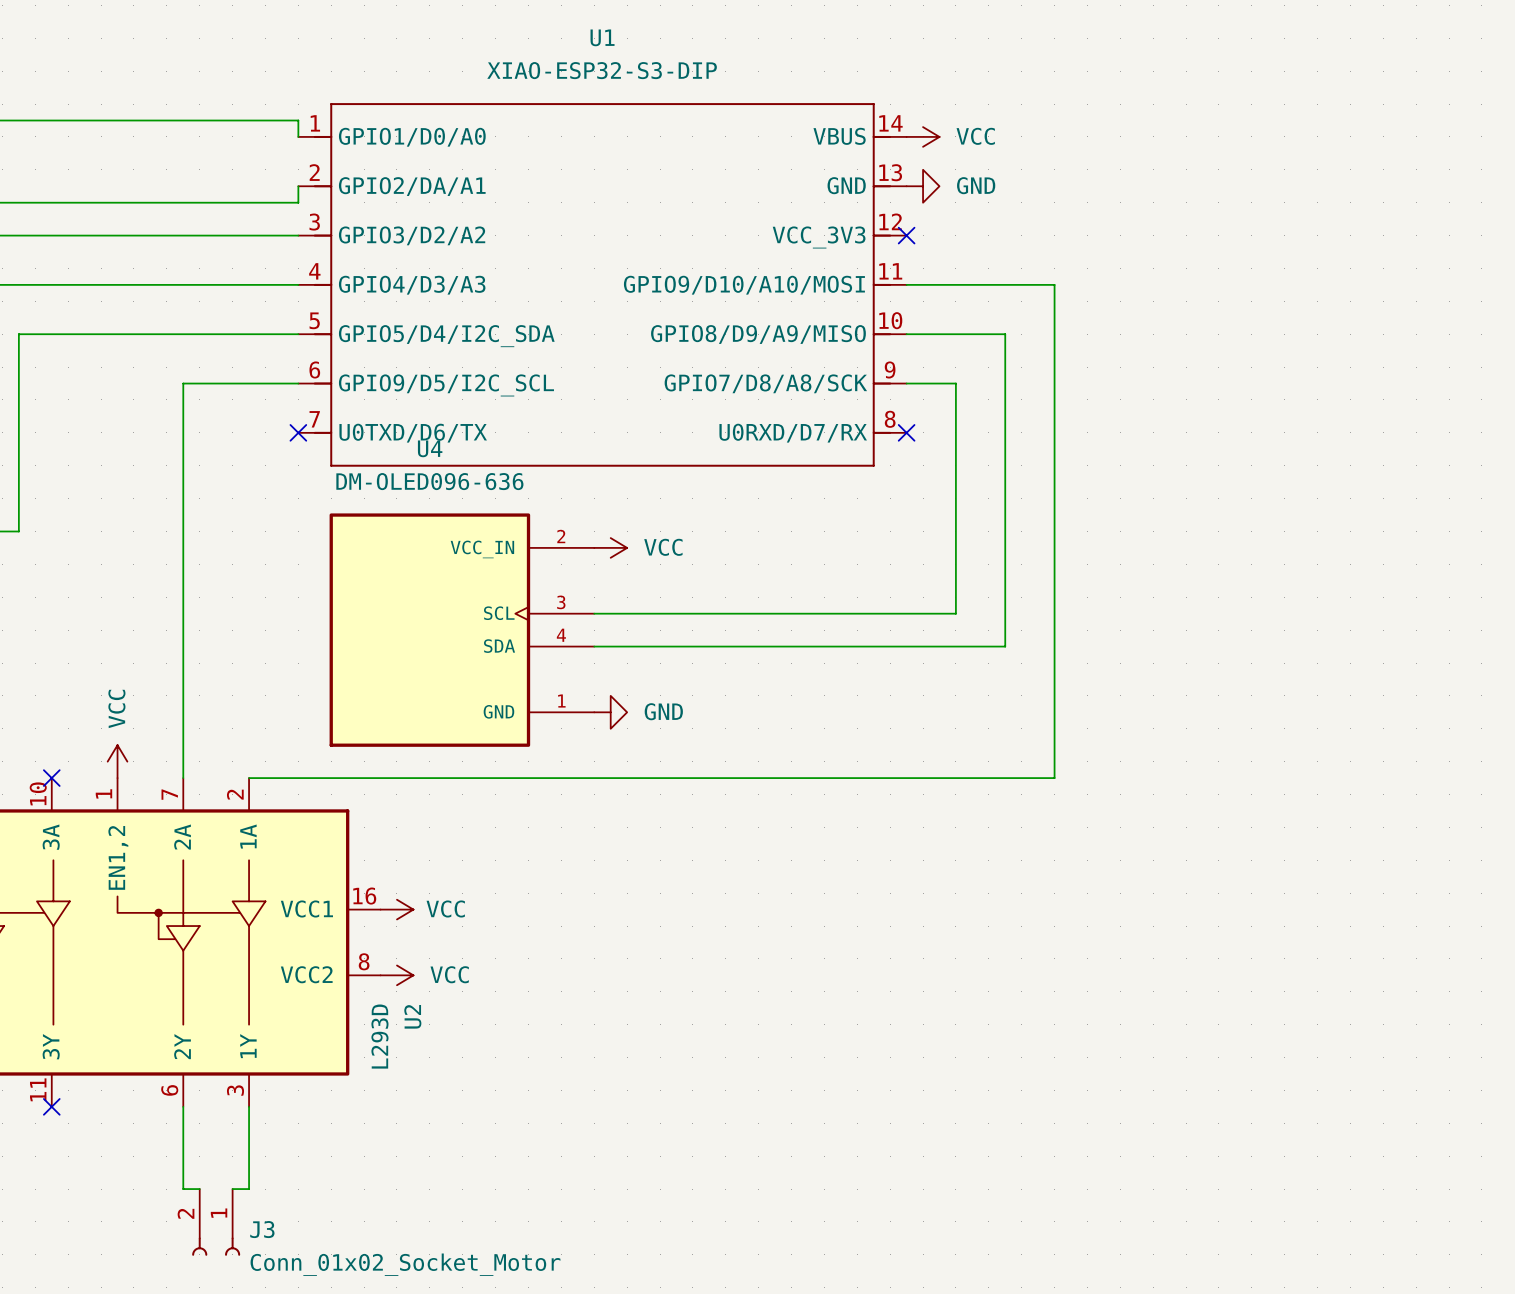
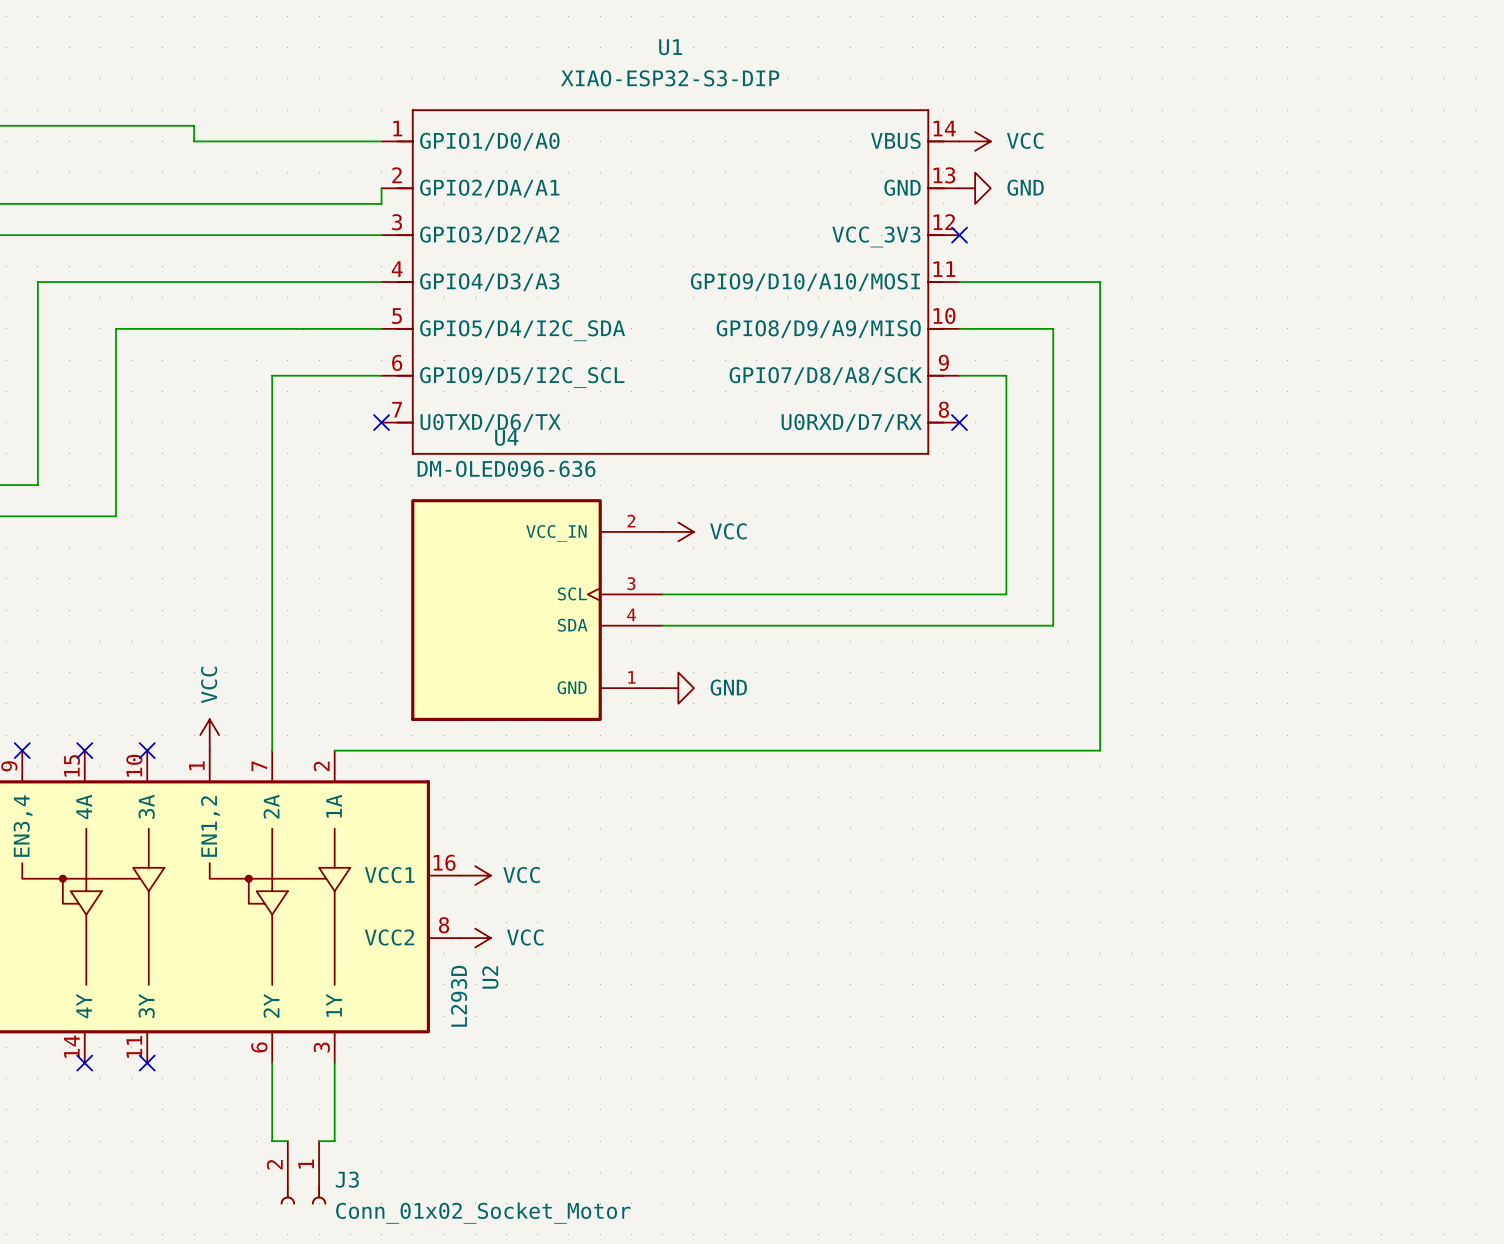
wire: (101, 120) (298, 120) (298, 136) -> (194, 125) (194, 141) (381, 141)

